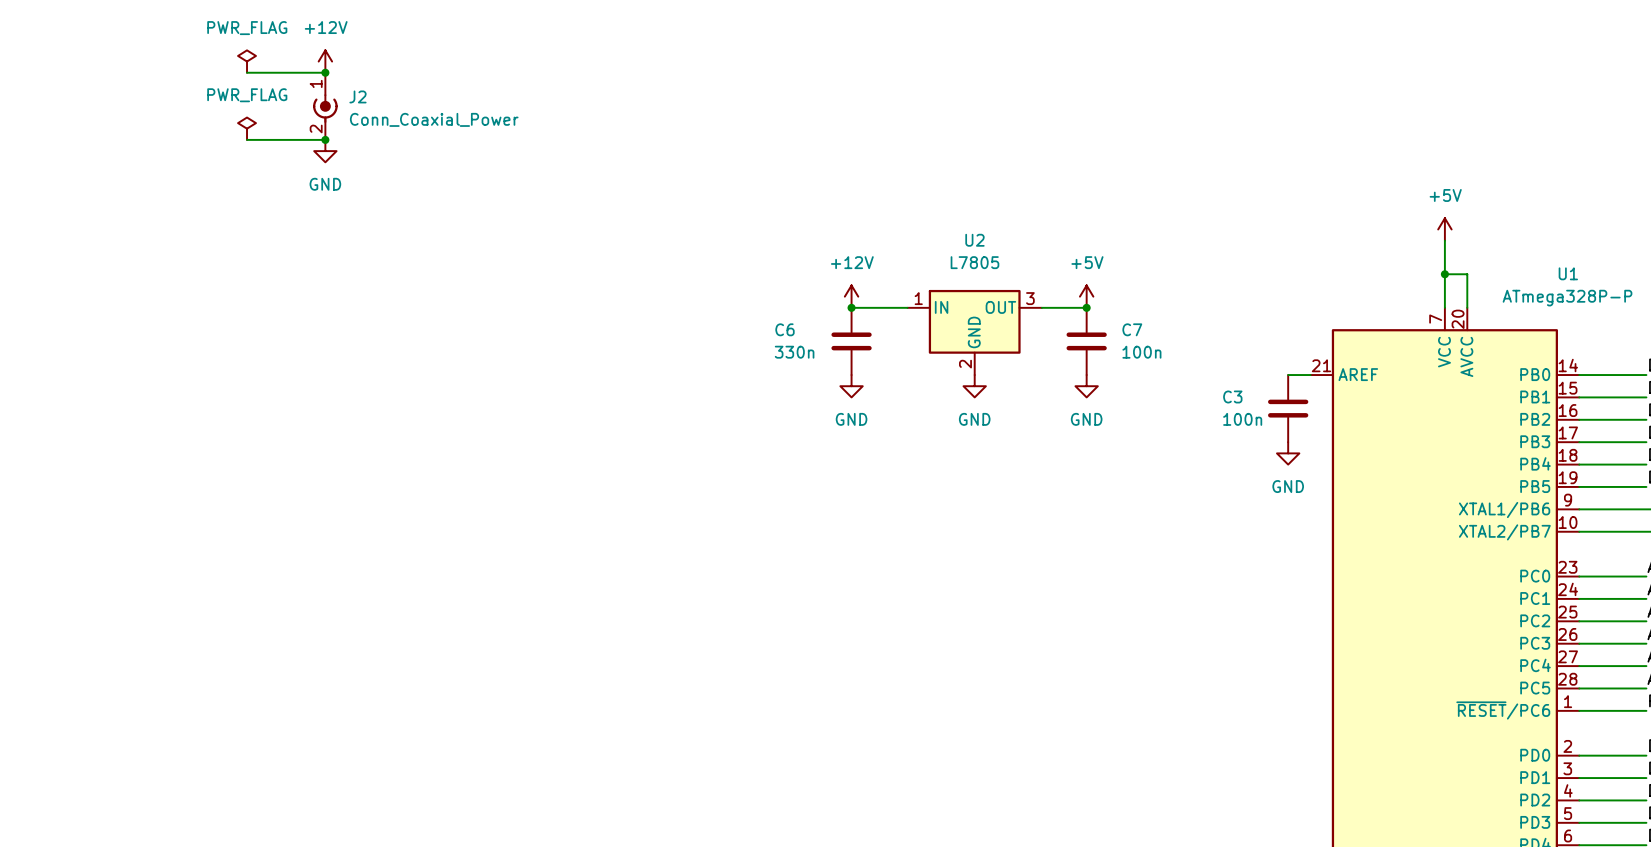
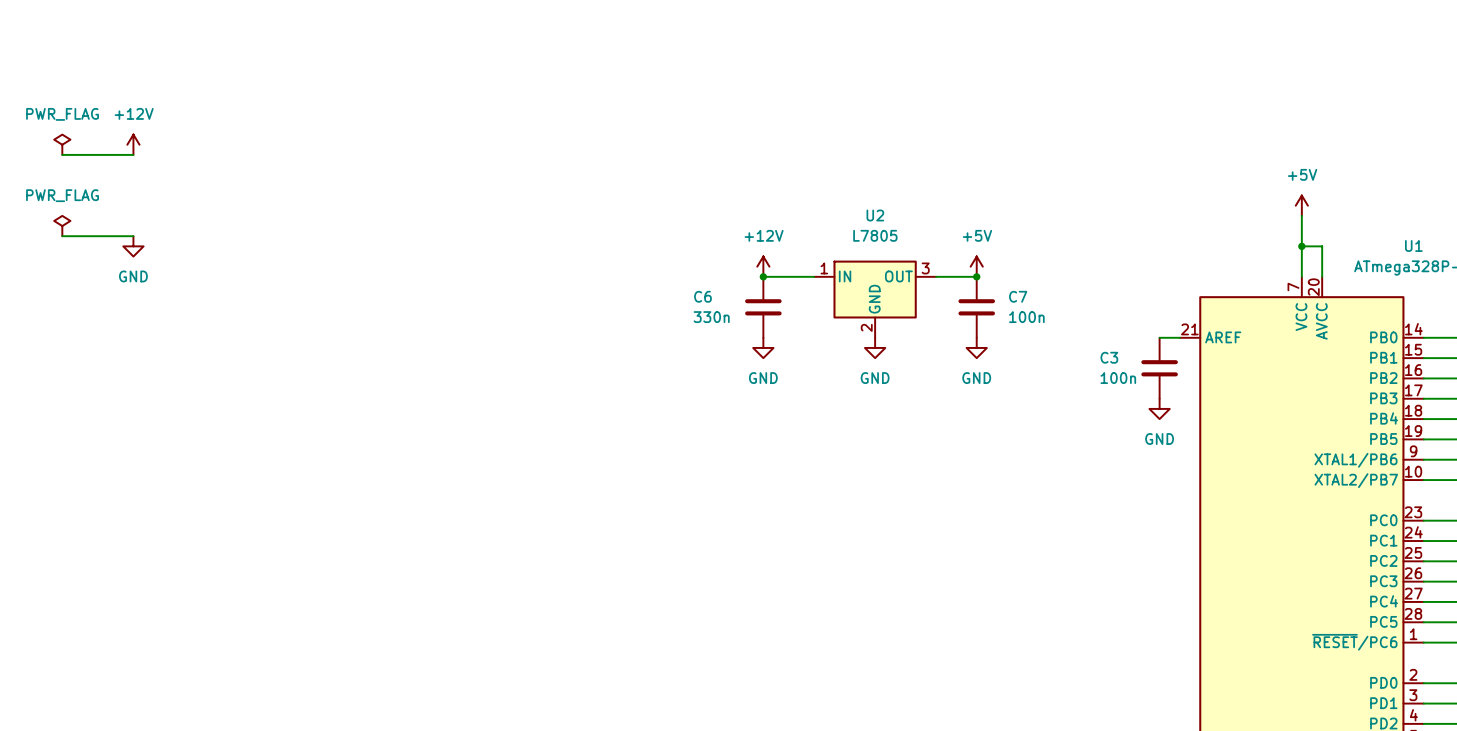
power symbol: PWR_FLAG (247, 61) -> none
power symbol position: +12V (325, 61) -> +12V (133, 144)
wire: (247, 72) (325, 72) -> none
junction: (325, 72) -> none
J2: Conn_Coaxial_Power (325, 106) -> none
power symbol: PWR_FLAG (247, 128) -> none
wire: (247, 139) (325, 139) -> (62, 154) (133, 154)
junction: (325, 139) -> none
power symbol position: GND (325, 151) -> GND (133, 246)
power symbol: none -> PWR_FLAG (62, 144)
power symbol: none -> PWR_FLAG (62, 226)
wire: none -> (62, 236) (133, 236)

